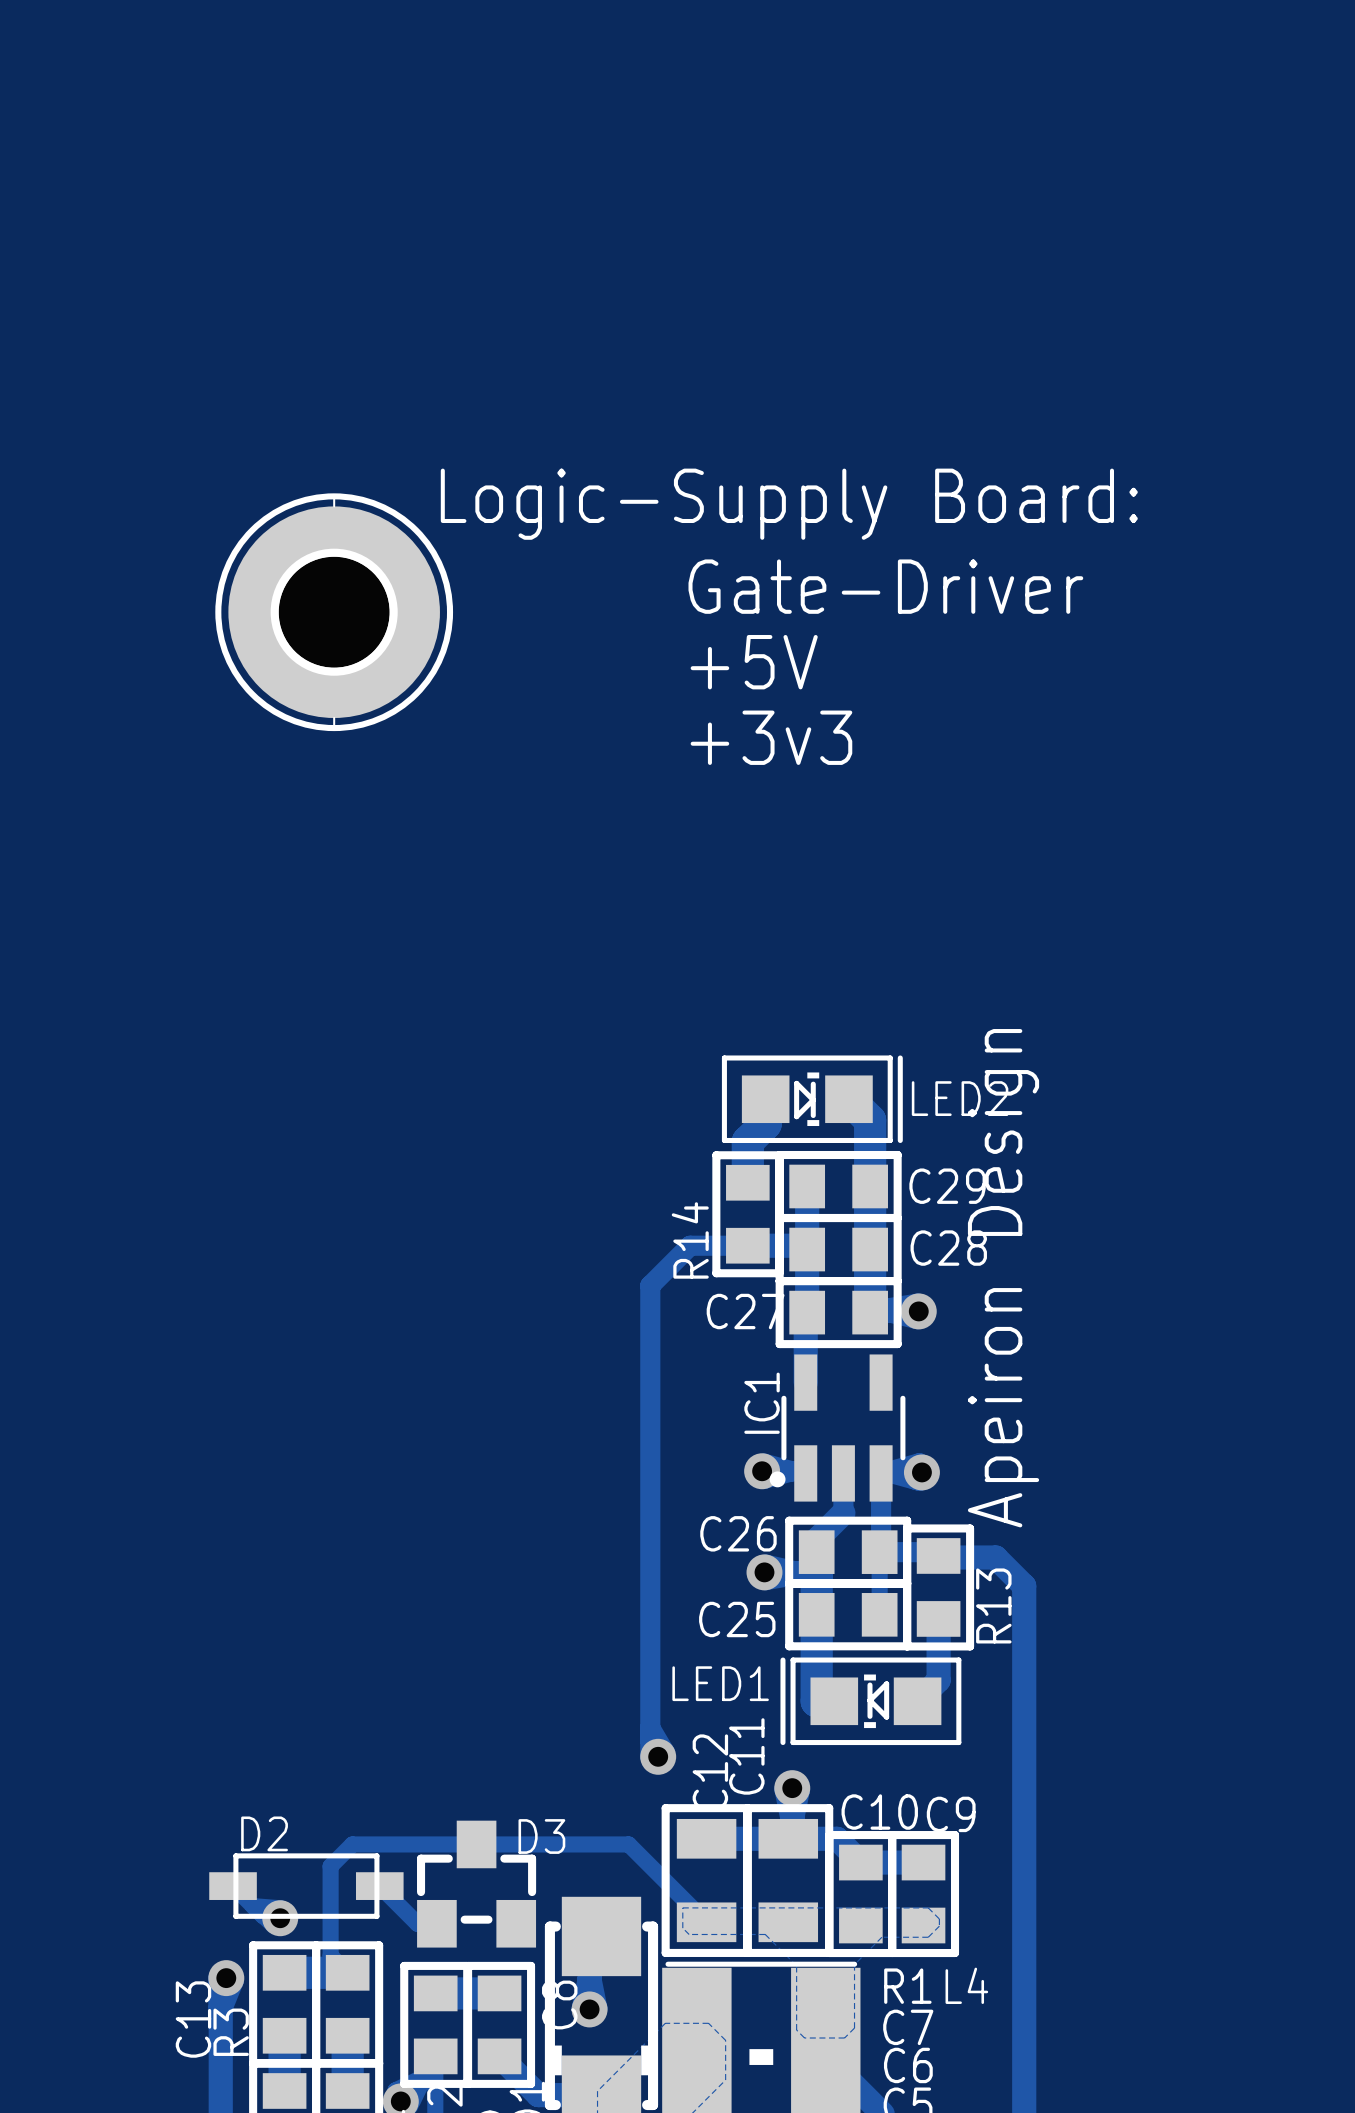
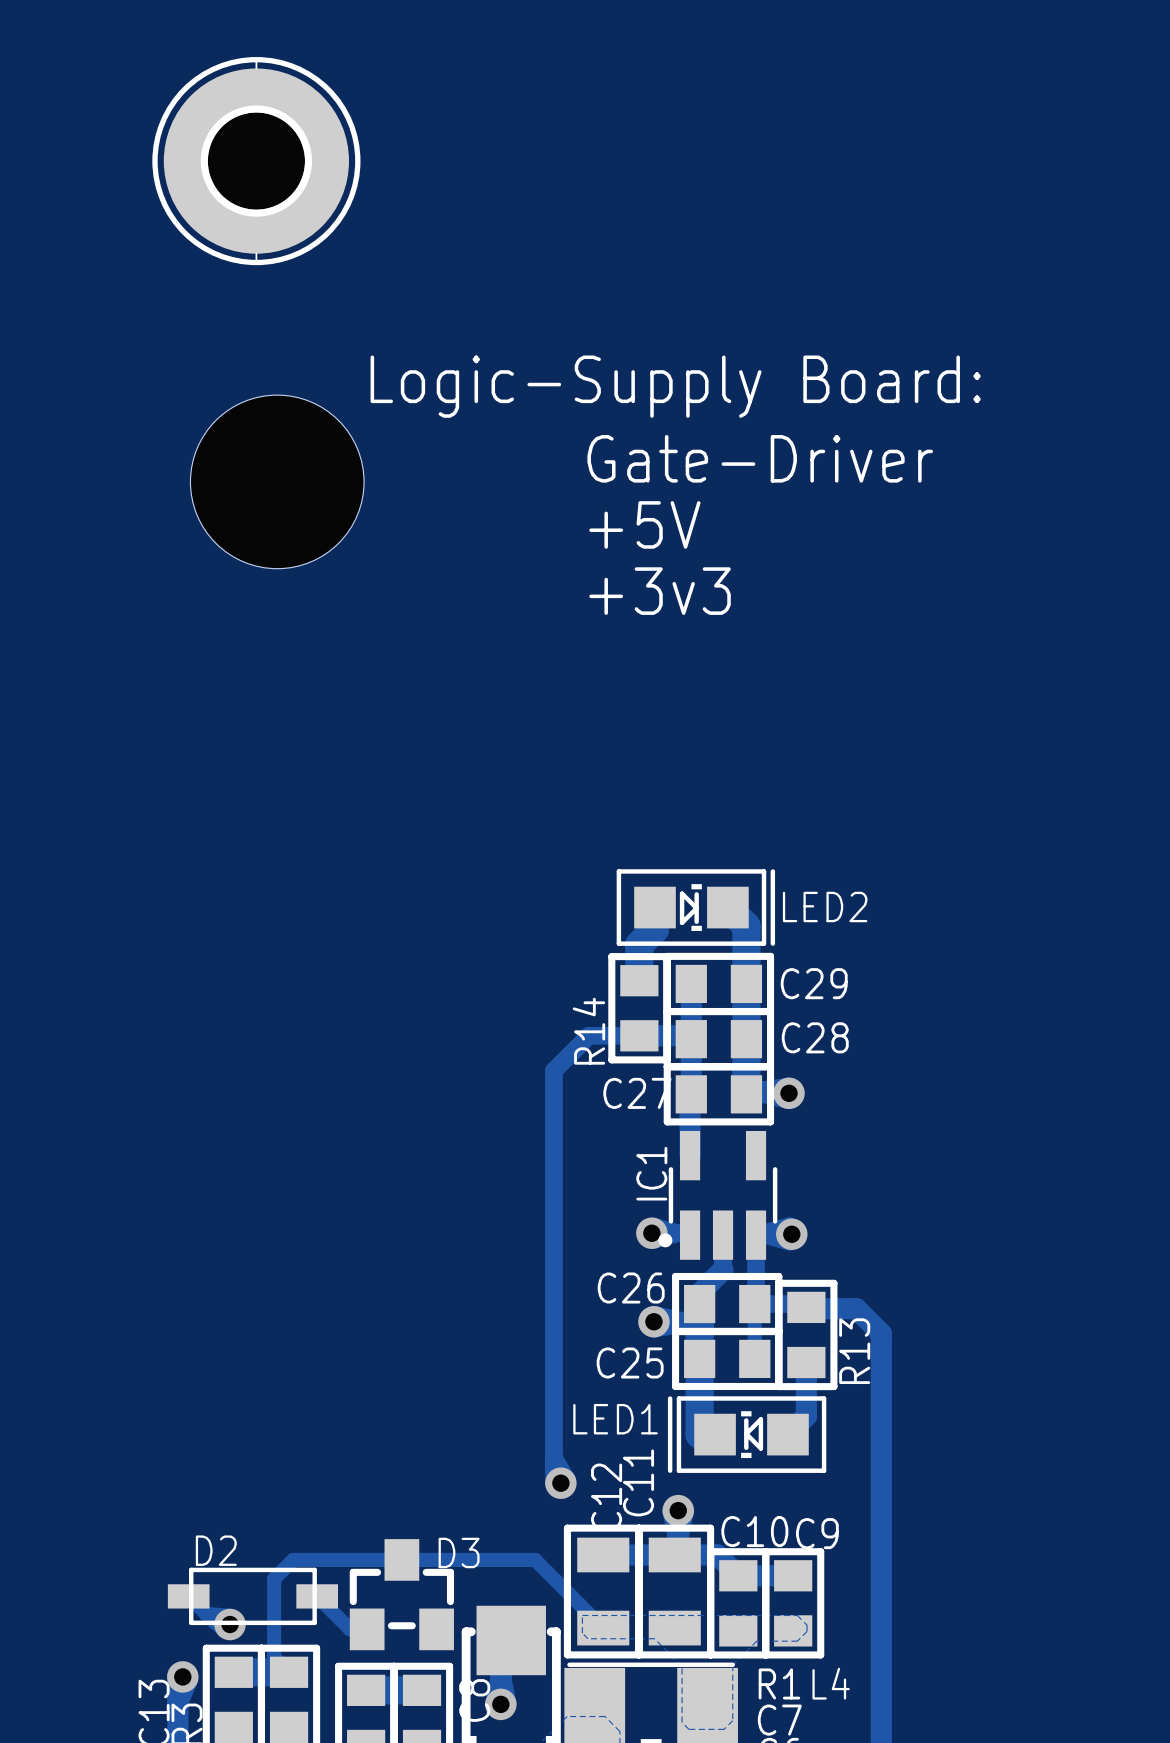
part position: (334, 612) -> (256, 161)
hole: none -> (277, 481)
text: Apeiron Design (1003, 1278) -> none

